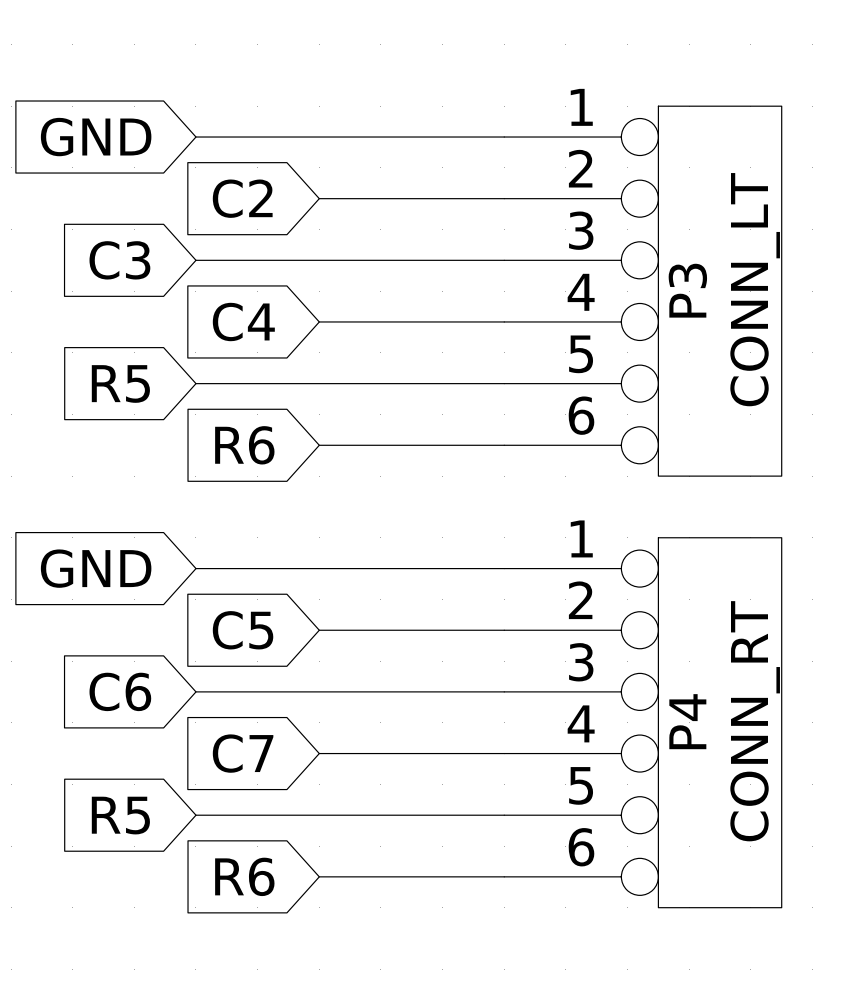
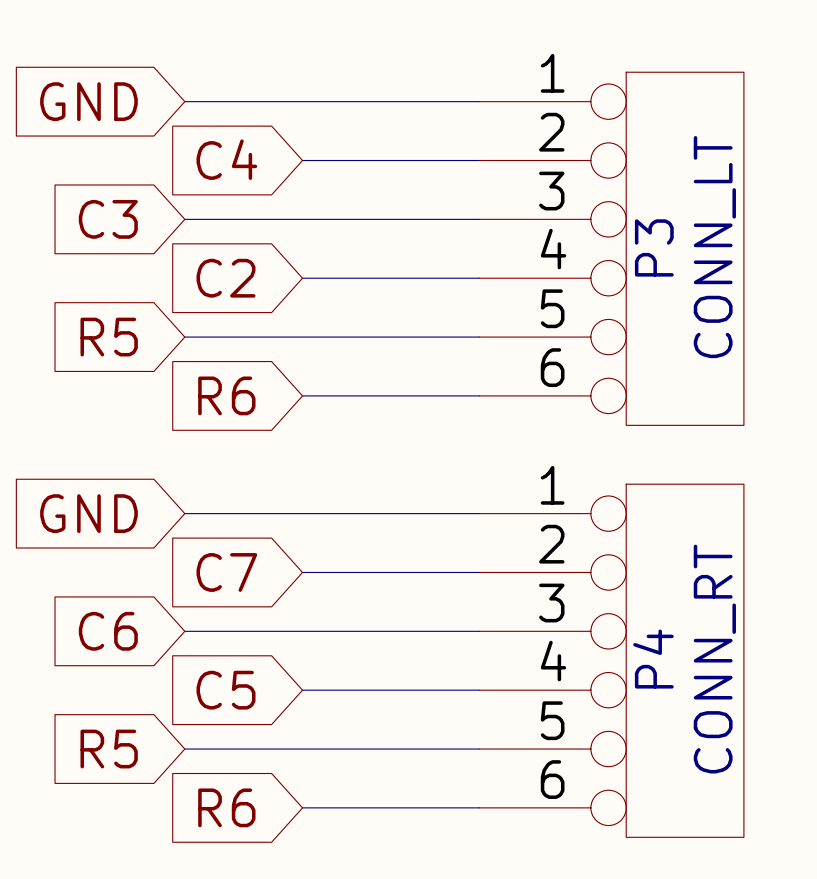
global label: C2 (242, 198) -> C4 (226, 159)
global label: C4 (243, 322) -> C2 (226, 278)
global label: C5 (243, 630) -> C7 (226, 572)
global label: C7 (243, 753) -> C5 (226, 690)

